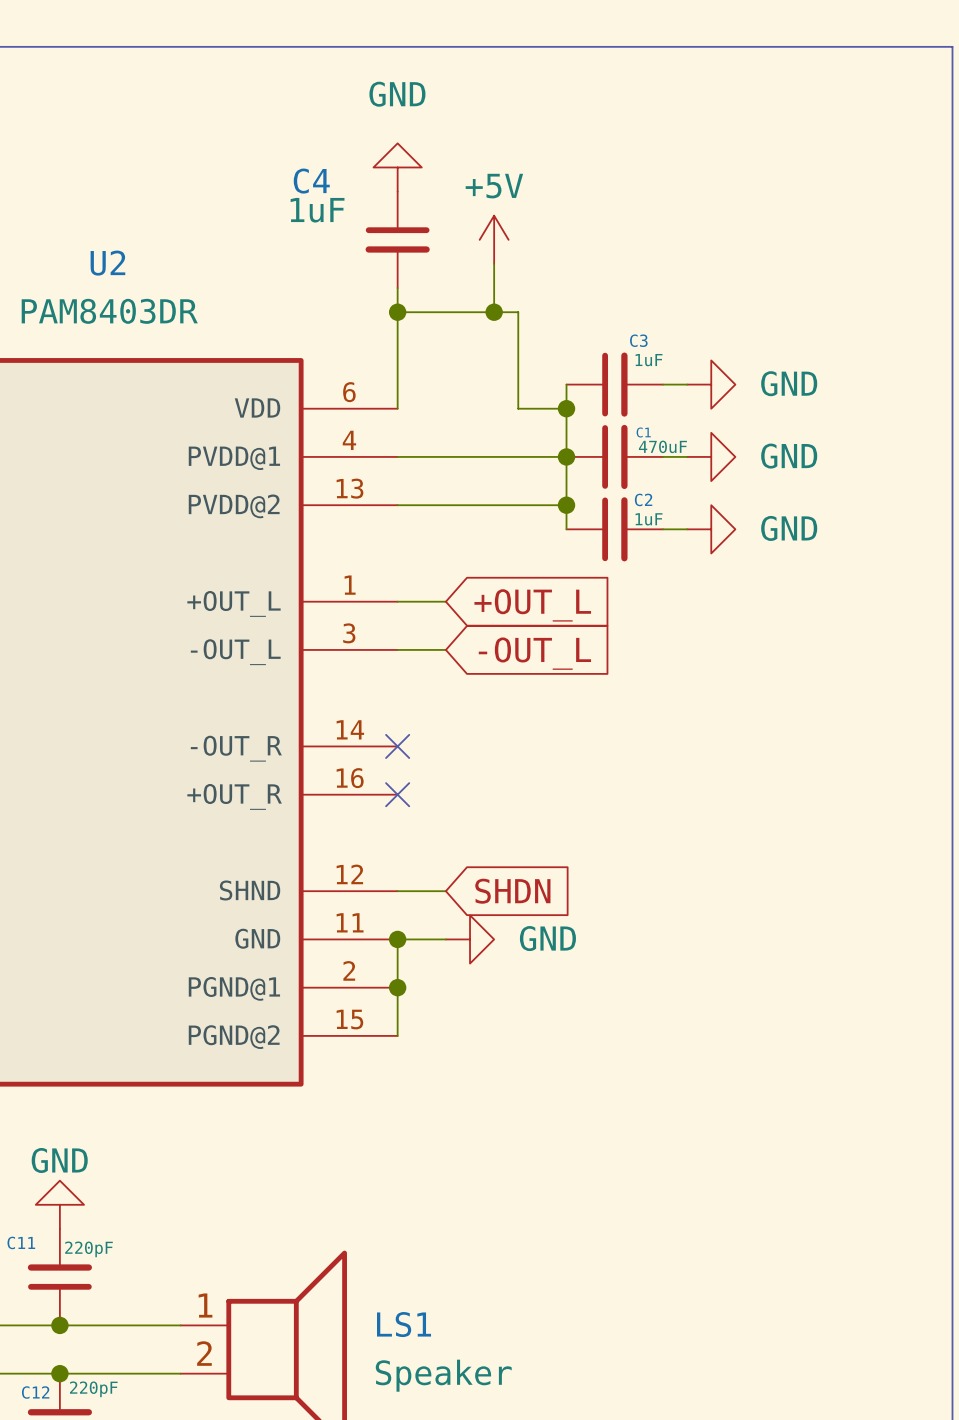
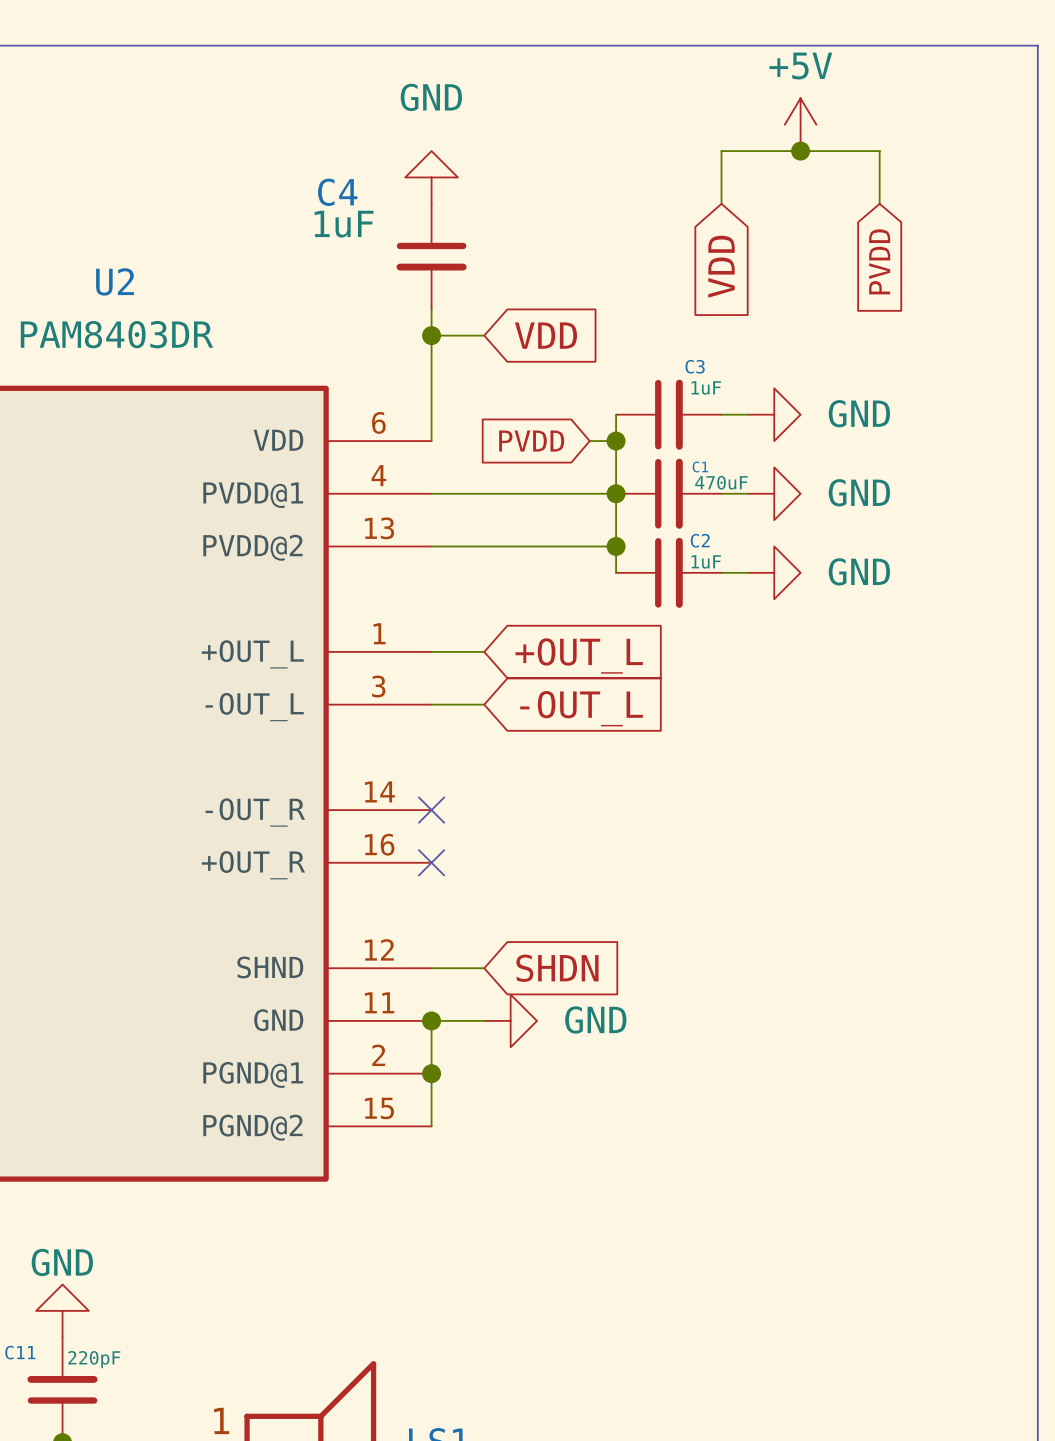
junction: none -> (800, 151)
wire: none -> (721, 203) (721, 151) (879, 151) (879, 203)
power symbol position: +5V (494, 239) -> +5V (800, 124)
global label: none -> PVDD (879, 261)
global label: none -> VDD (721, 266)
wire: (494, 263) (494, 312) -> none
wire: (445, 312) (518, 312) (518, 408) (542, 408) -> none
junction: (494, 312) -> none
global label: none -> VDD (545, 335)
global label: none -> PVDD (531, 441)

